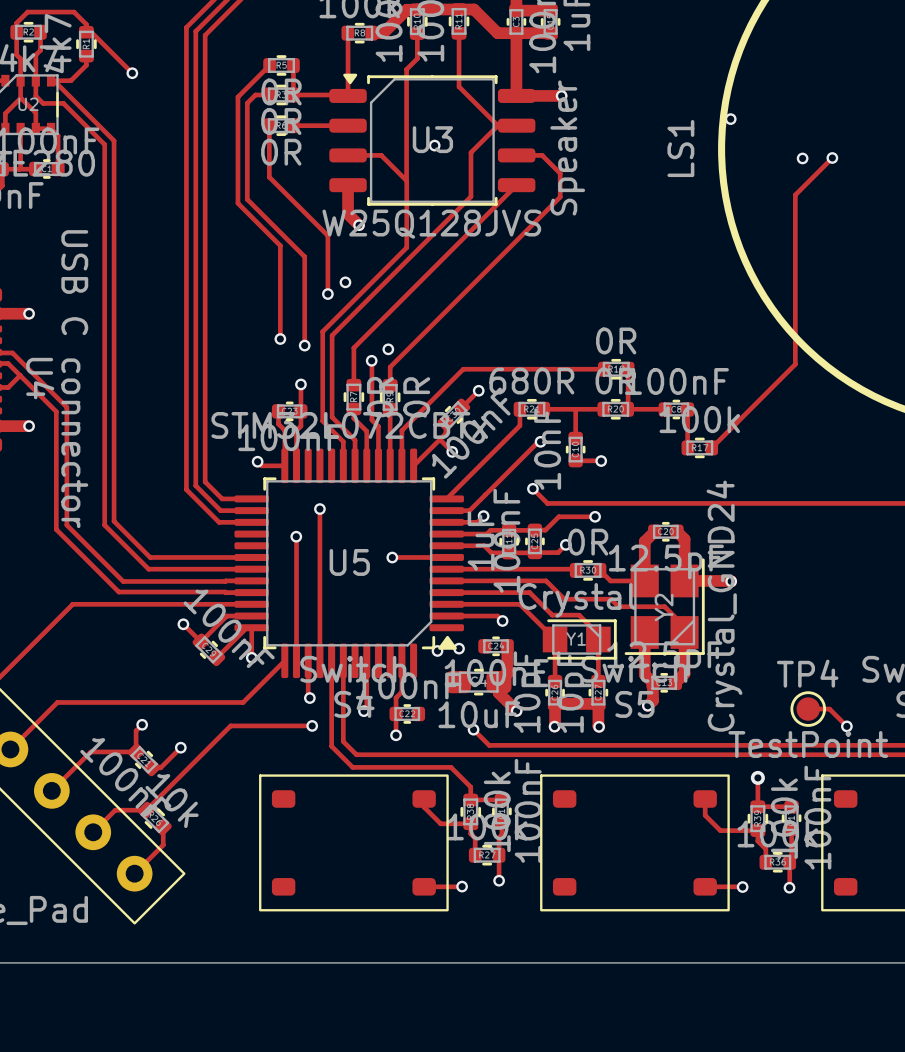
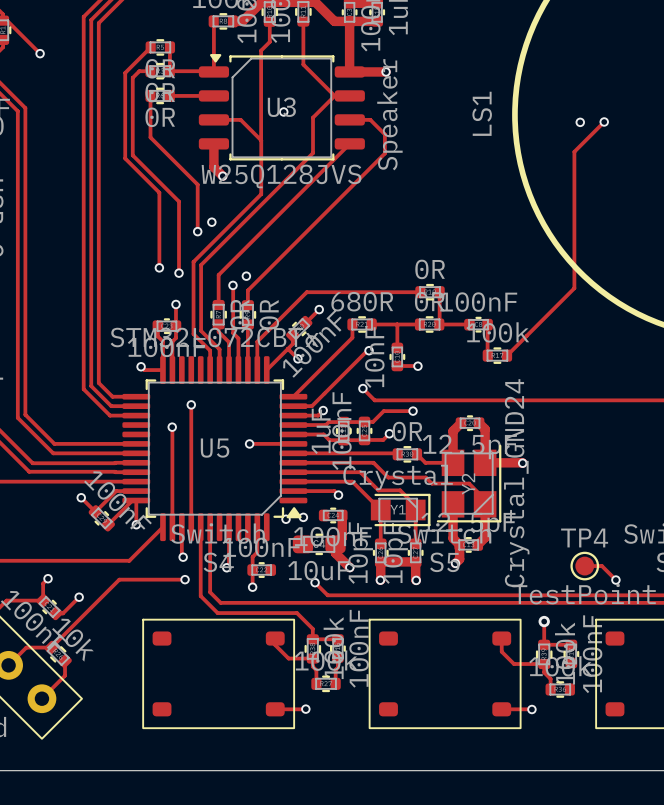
via: (730, 119) -> none
track: (791, 829) (789, 887) -> none
track: (499, 855) (499, 880) -> none
via: (499, 880) -> none
via: (789, 887) -> none

